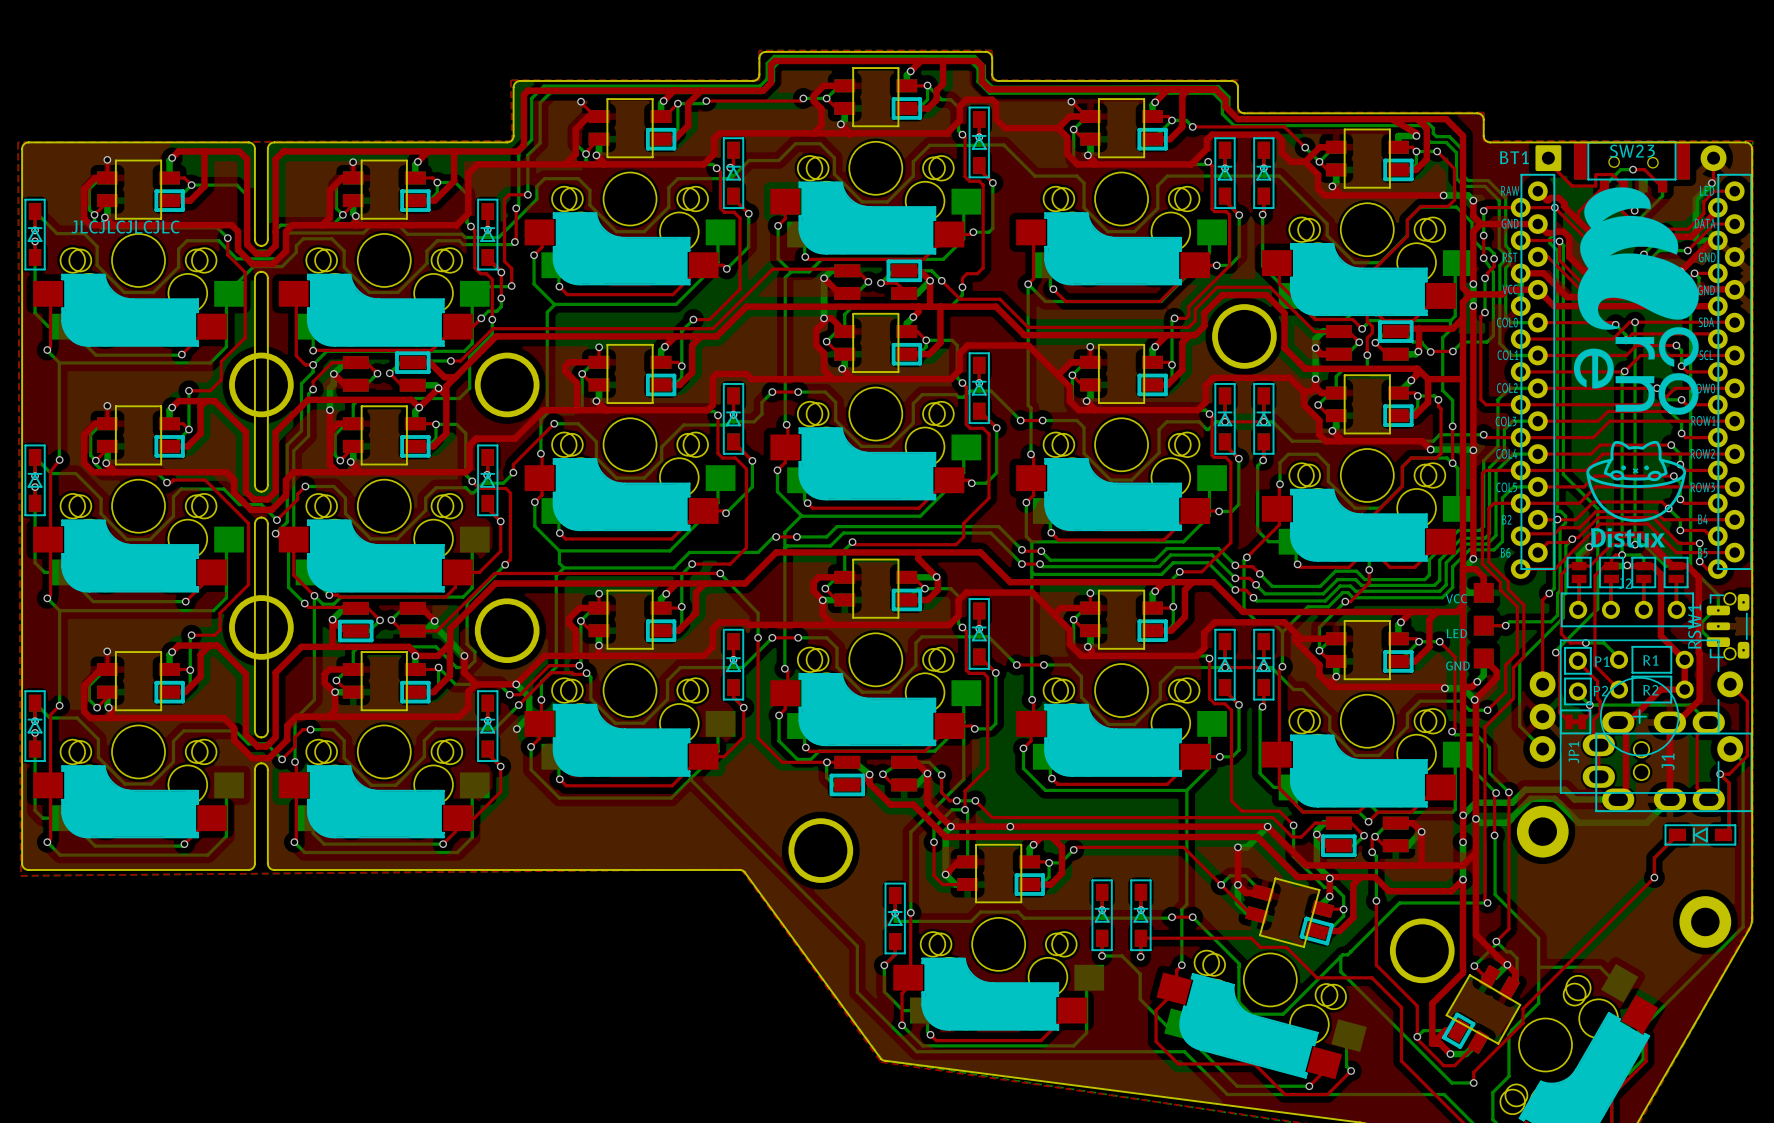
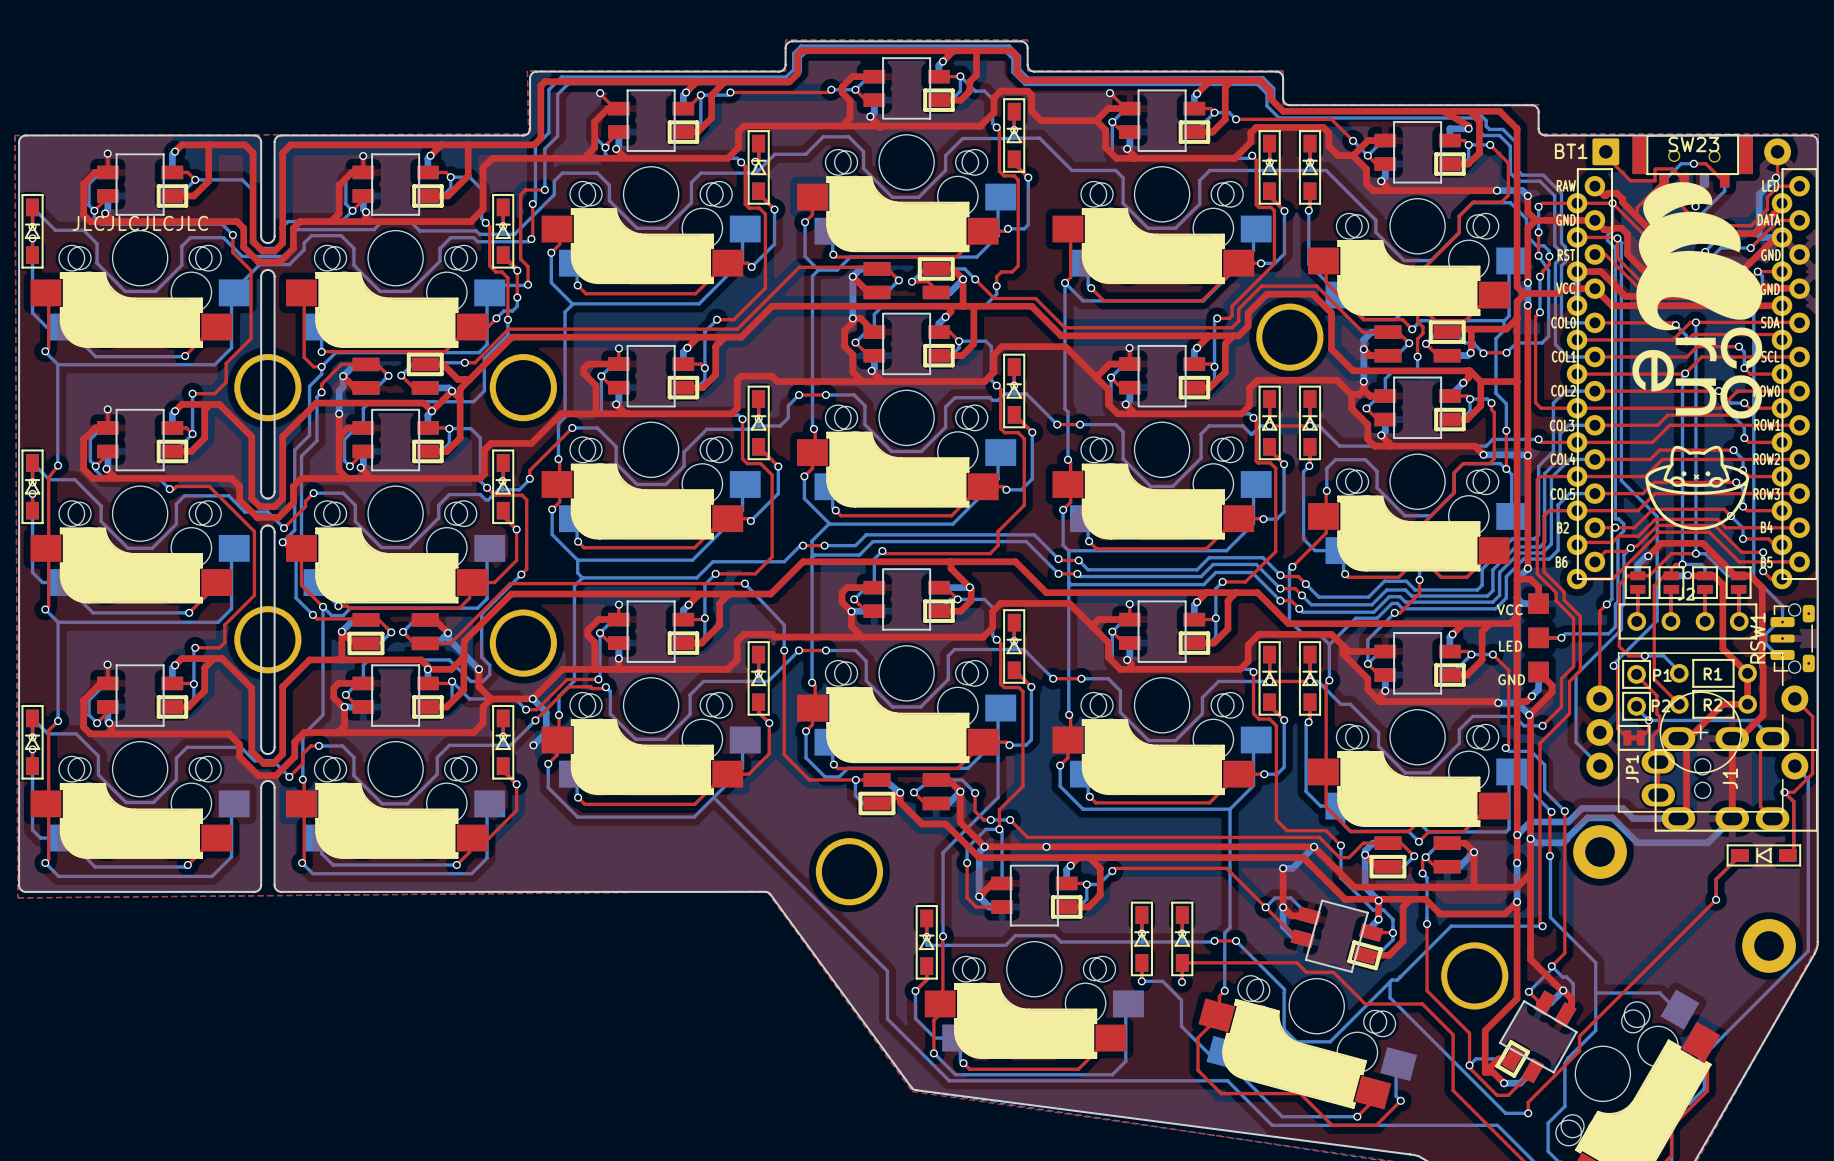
text: Distux (1628, 537) -> none

